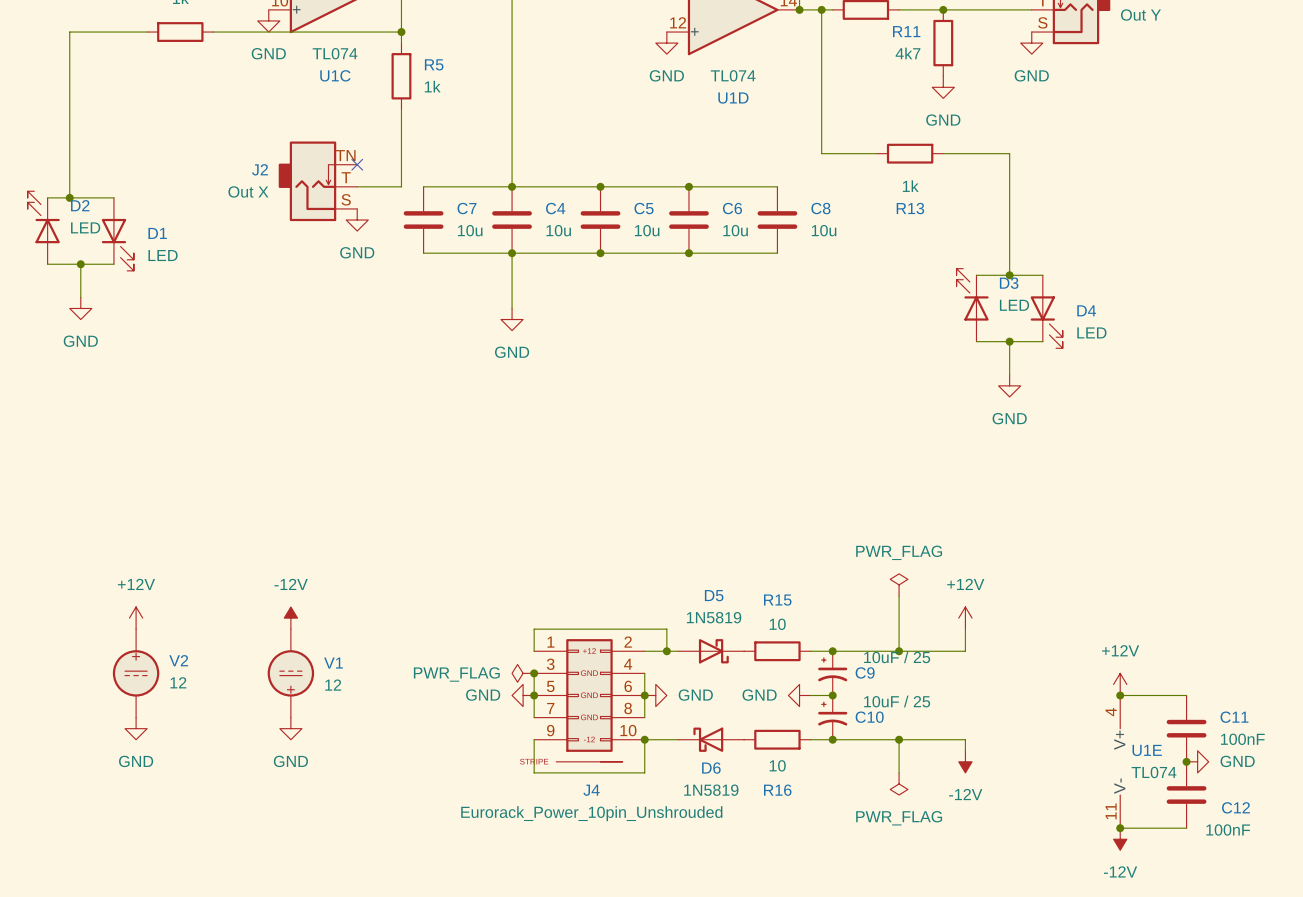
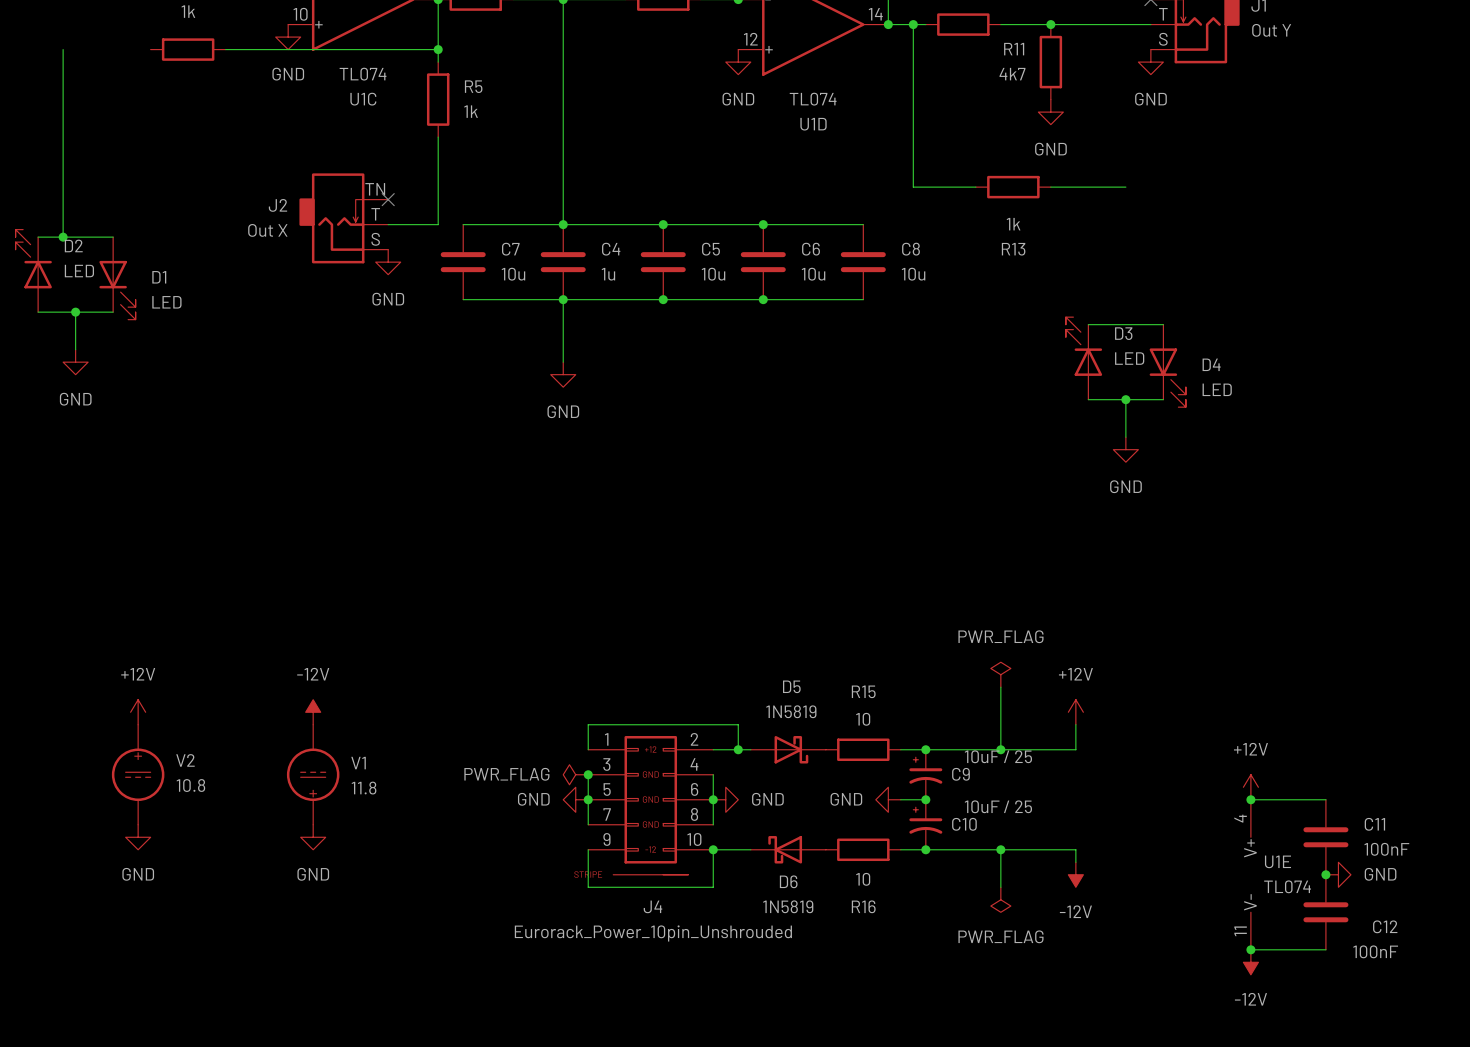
wire: (69, 32) (147, 32) -> none
wire: (1009, 153) (1009, 275) -> none
C4 value: 10u (558, 230) -> 1u (608, 274)
junction: (1009, 275) -> none
V2 value: 12 (178, 682) -> 10.8 (190, 785)
V1 value: 12 (333, 685) -> 11.8 (364, 788)

